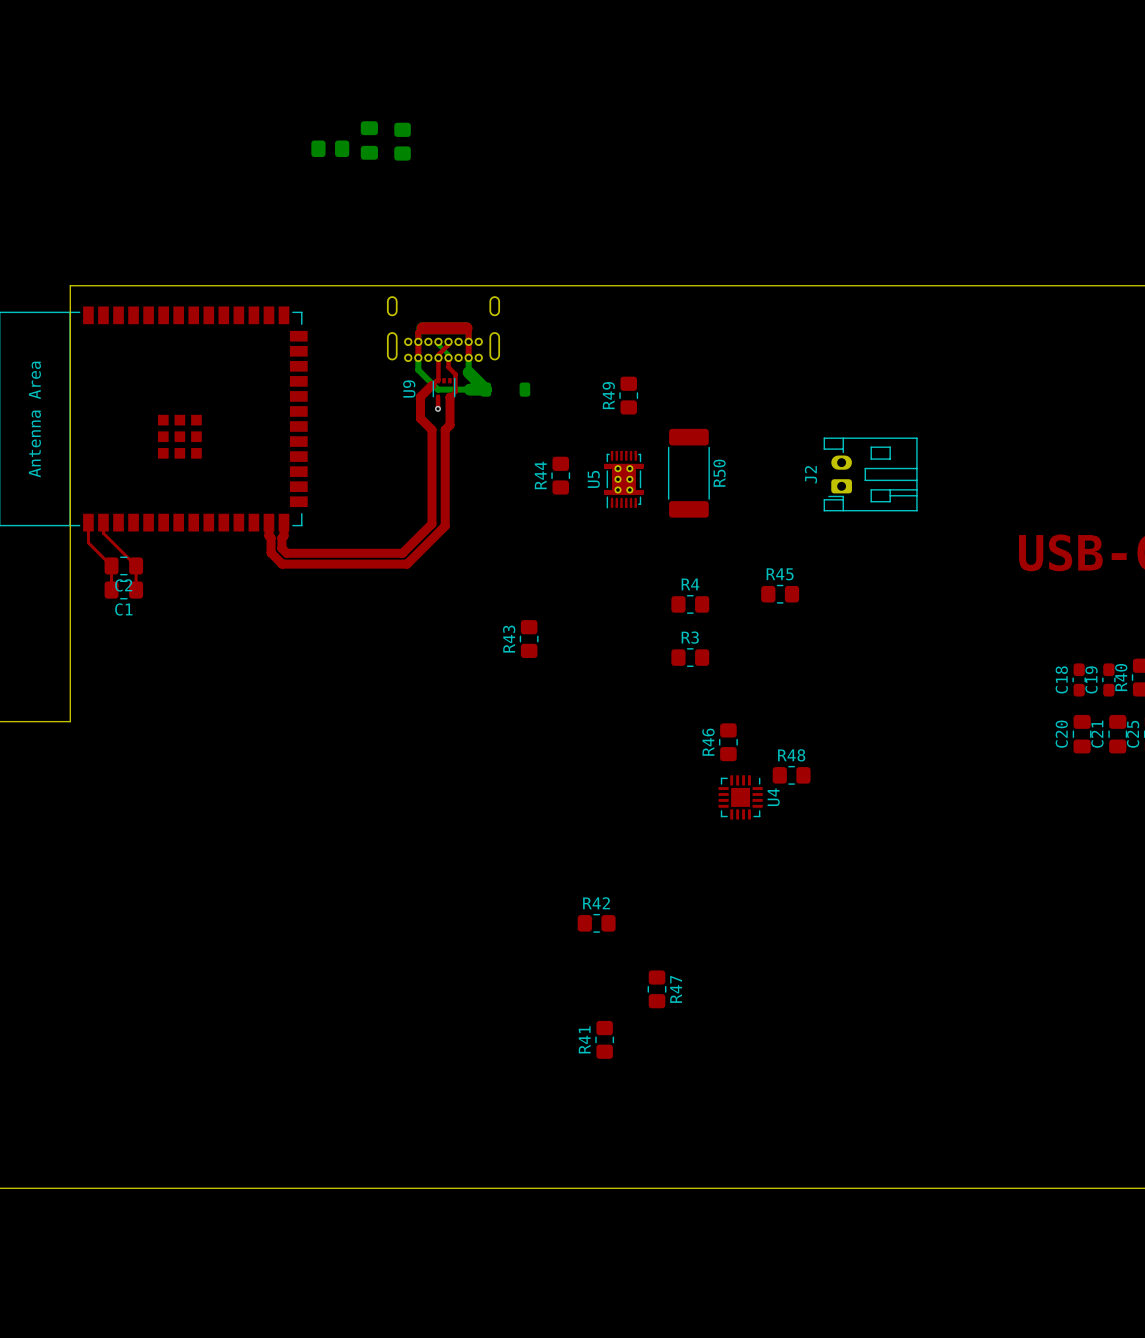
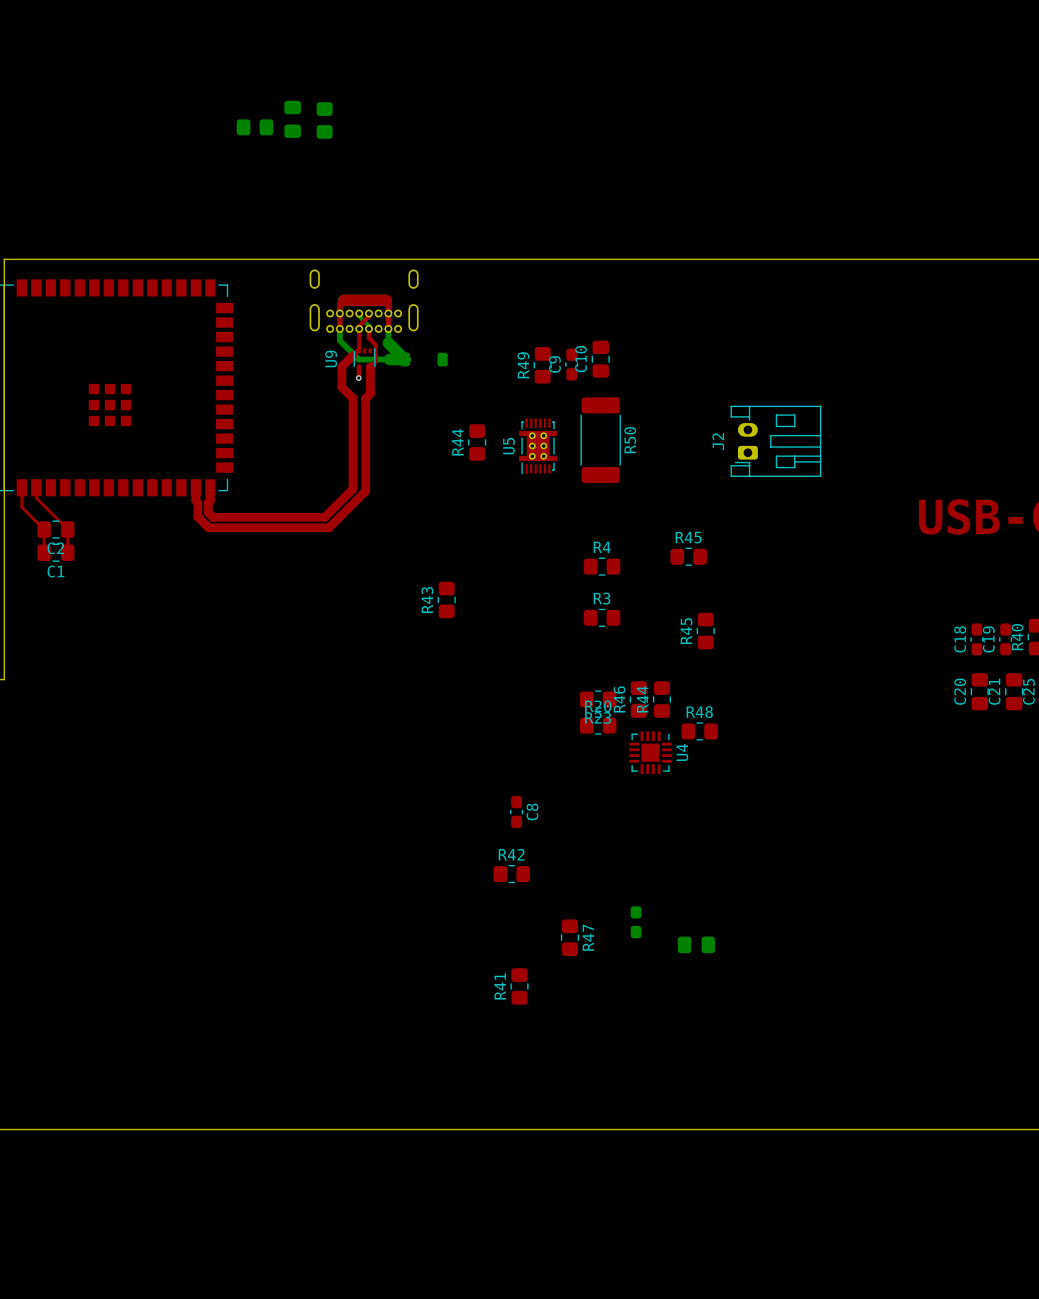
C10: none -> (600, 359)
C9: none -> (571, 364)
R45: none -> (705, 631)
R23: none -> (598, 699)
R44: none -> (661, 699)
R20: none -> (598, 725)
C8: none -> (516, 812)
part: none -> (636, 922)
part: none -> (696, 944)

